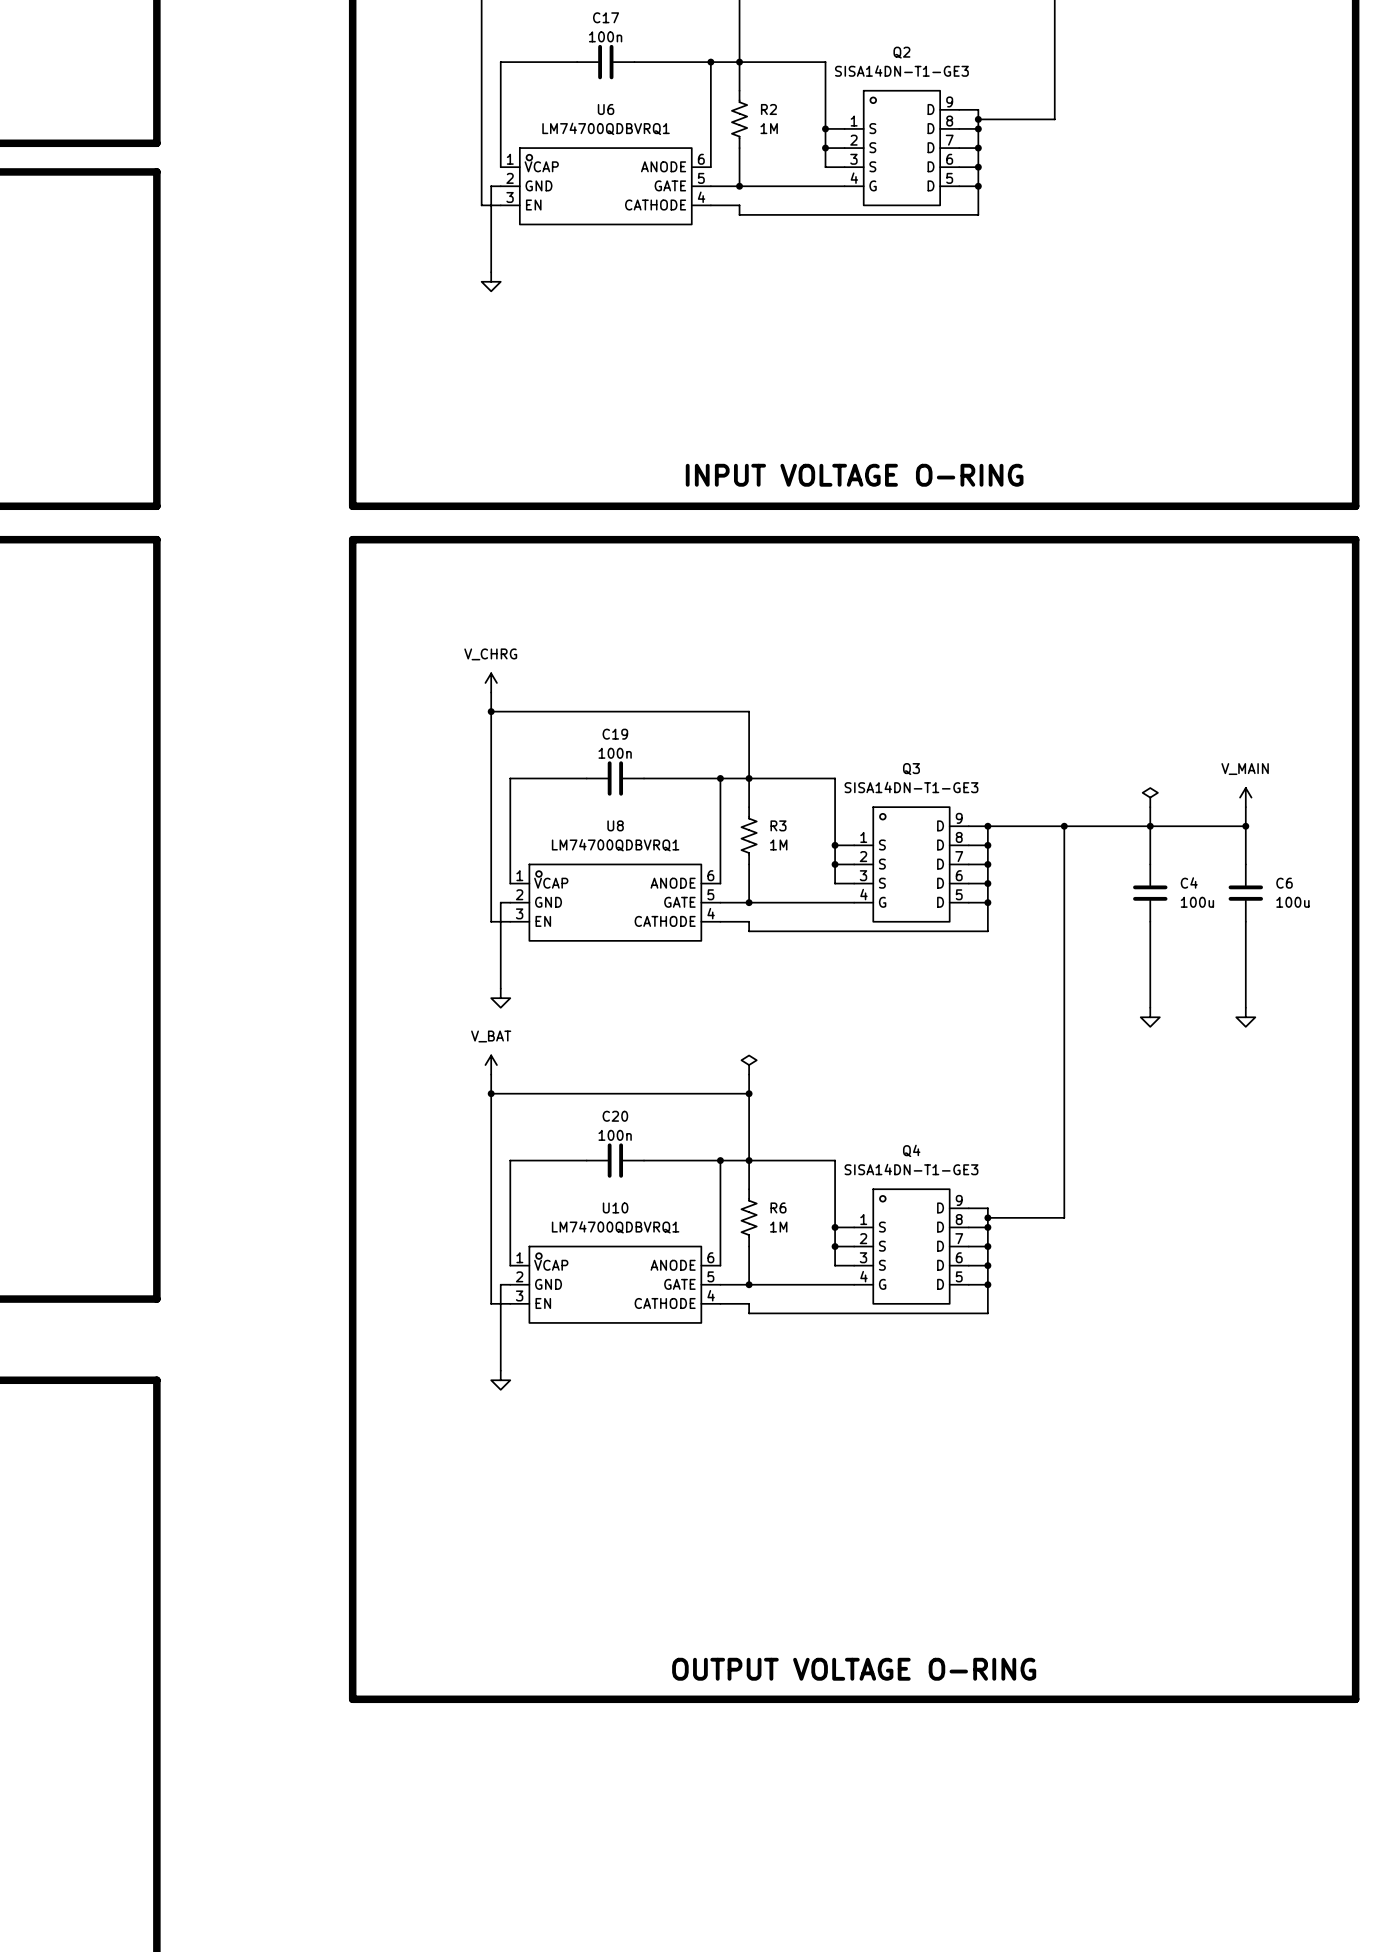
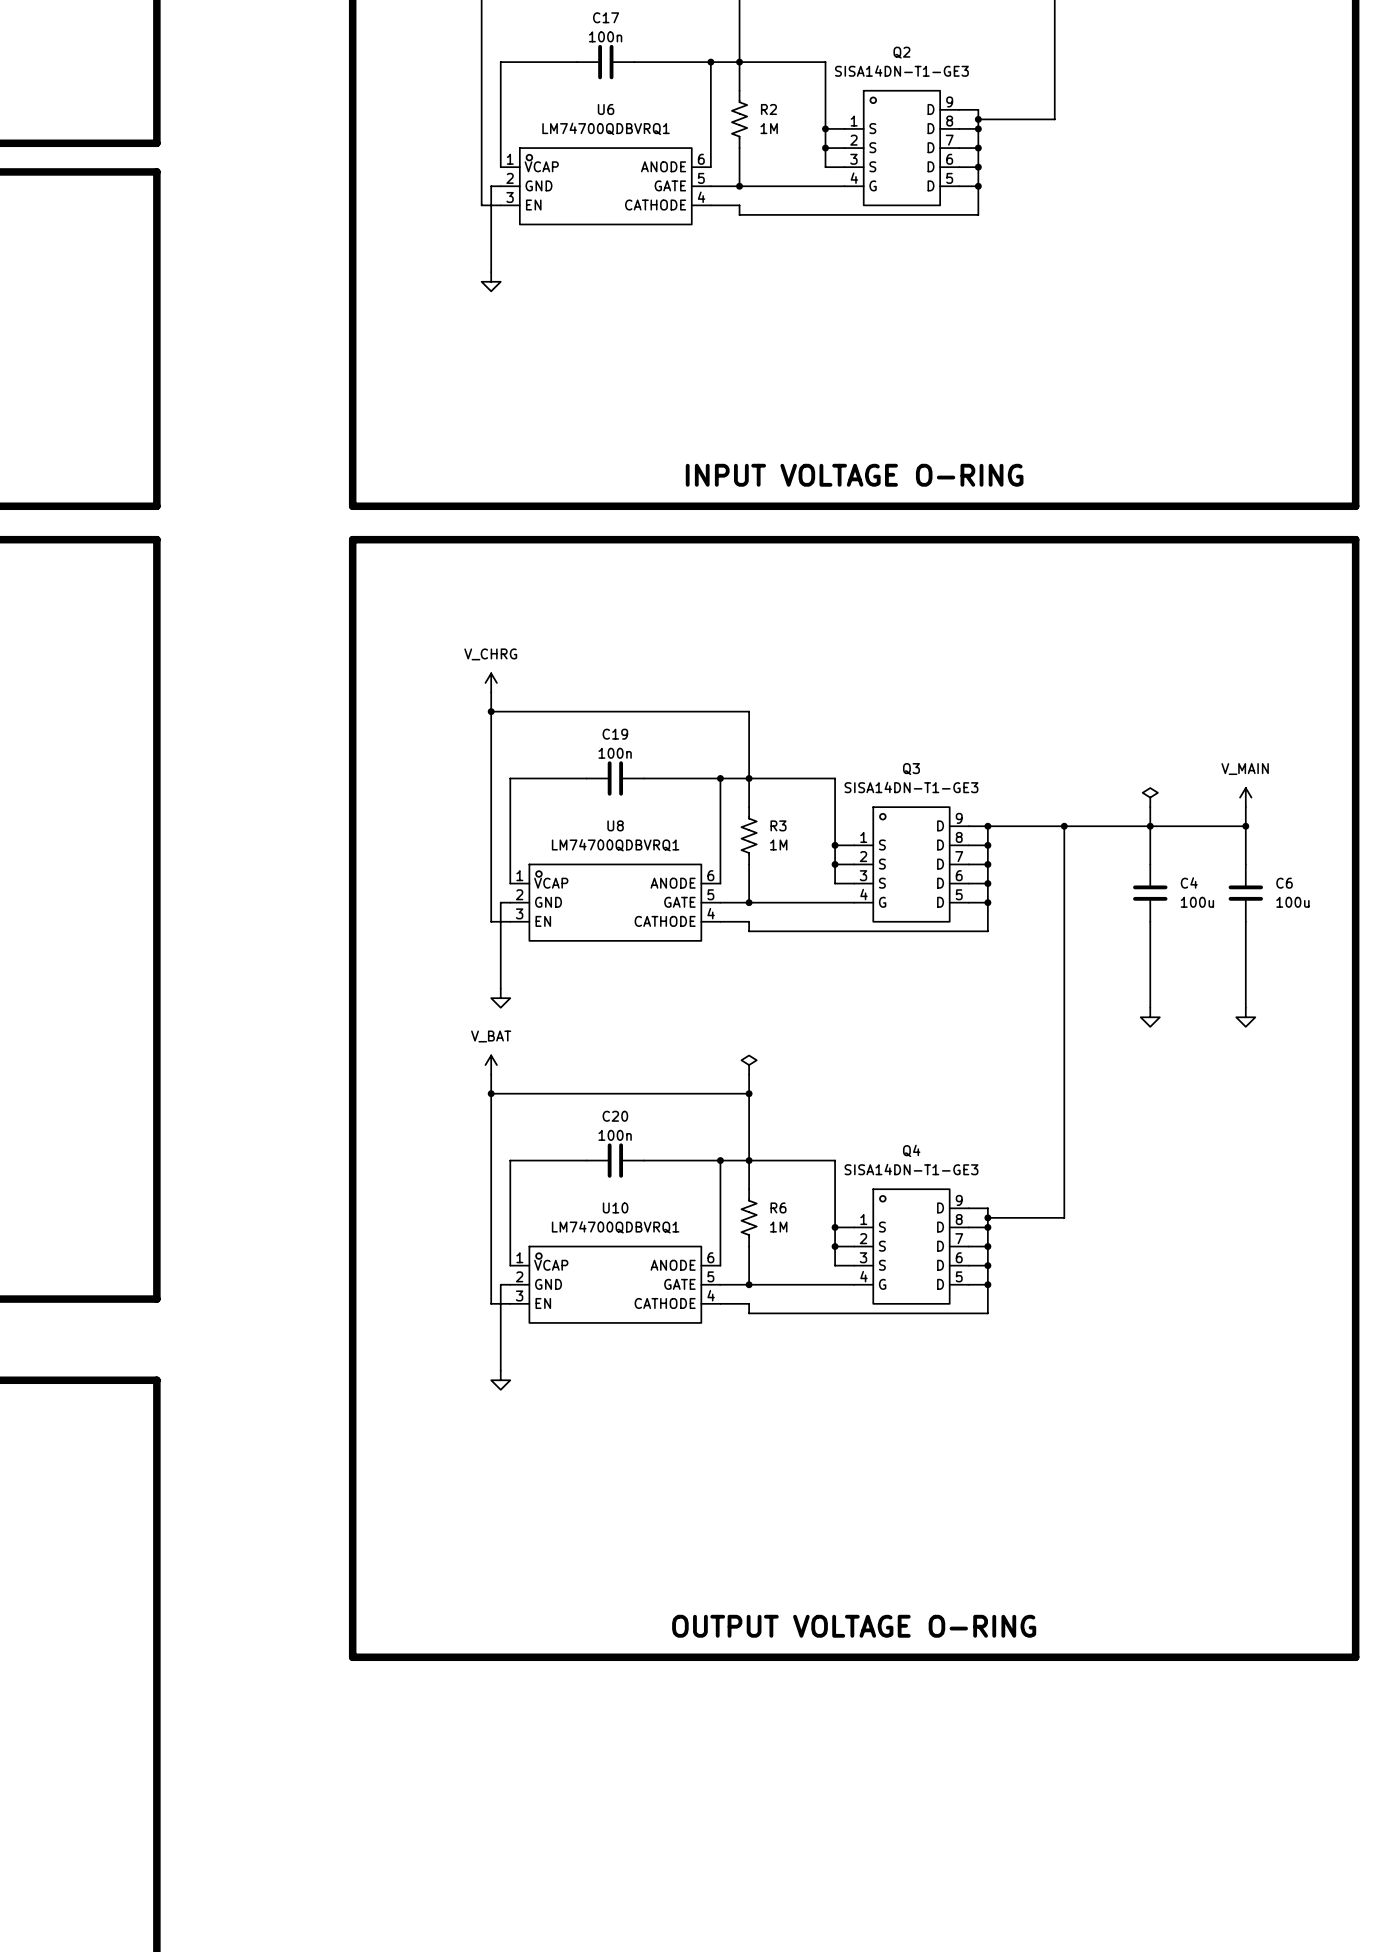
line: (352, 1657) (352, 1699) (1355, 1699) (1355, 1657) -> (352, 1657) (1355, 1657)
text position: OUTPUT VOLTAGE O-RING (854, 1669) -> OUTPUT VOLTAGE O-RING (854, 1626)

